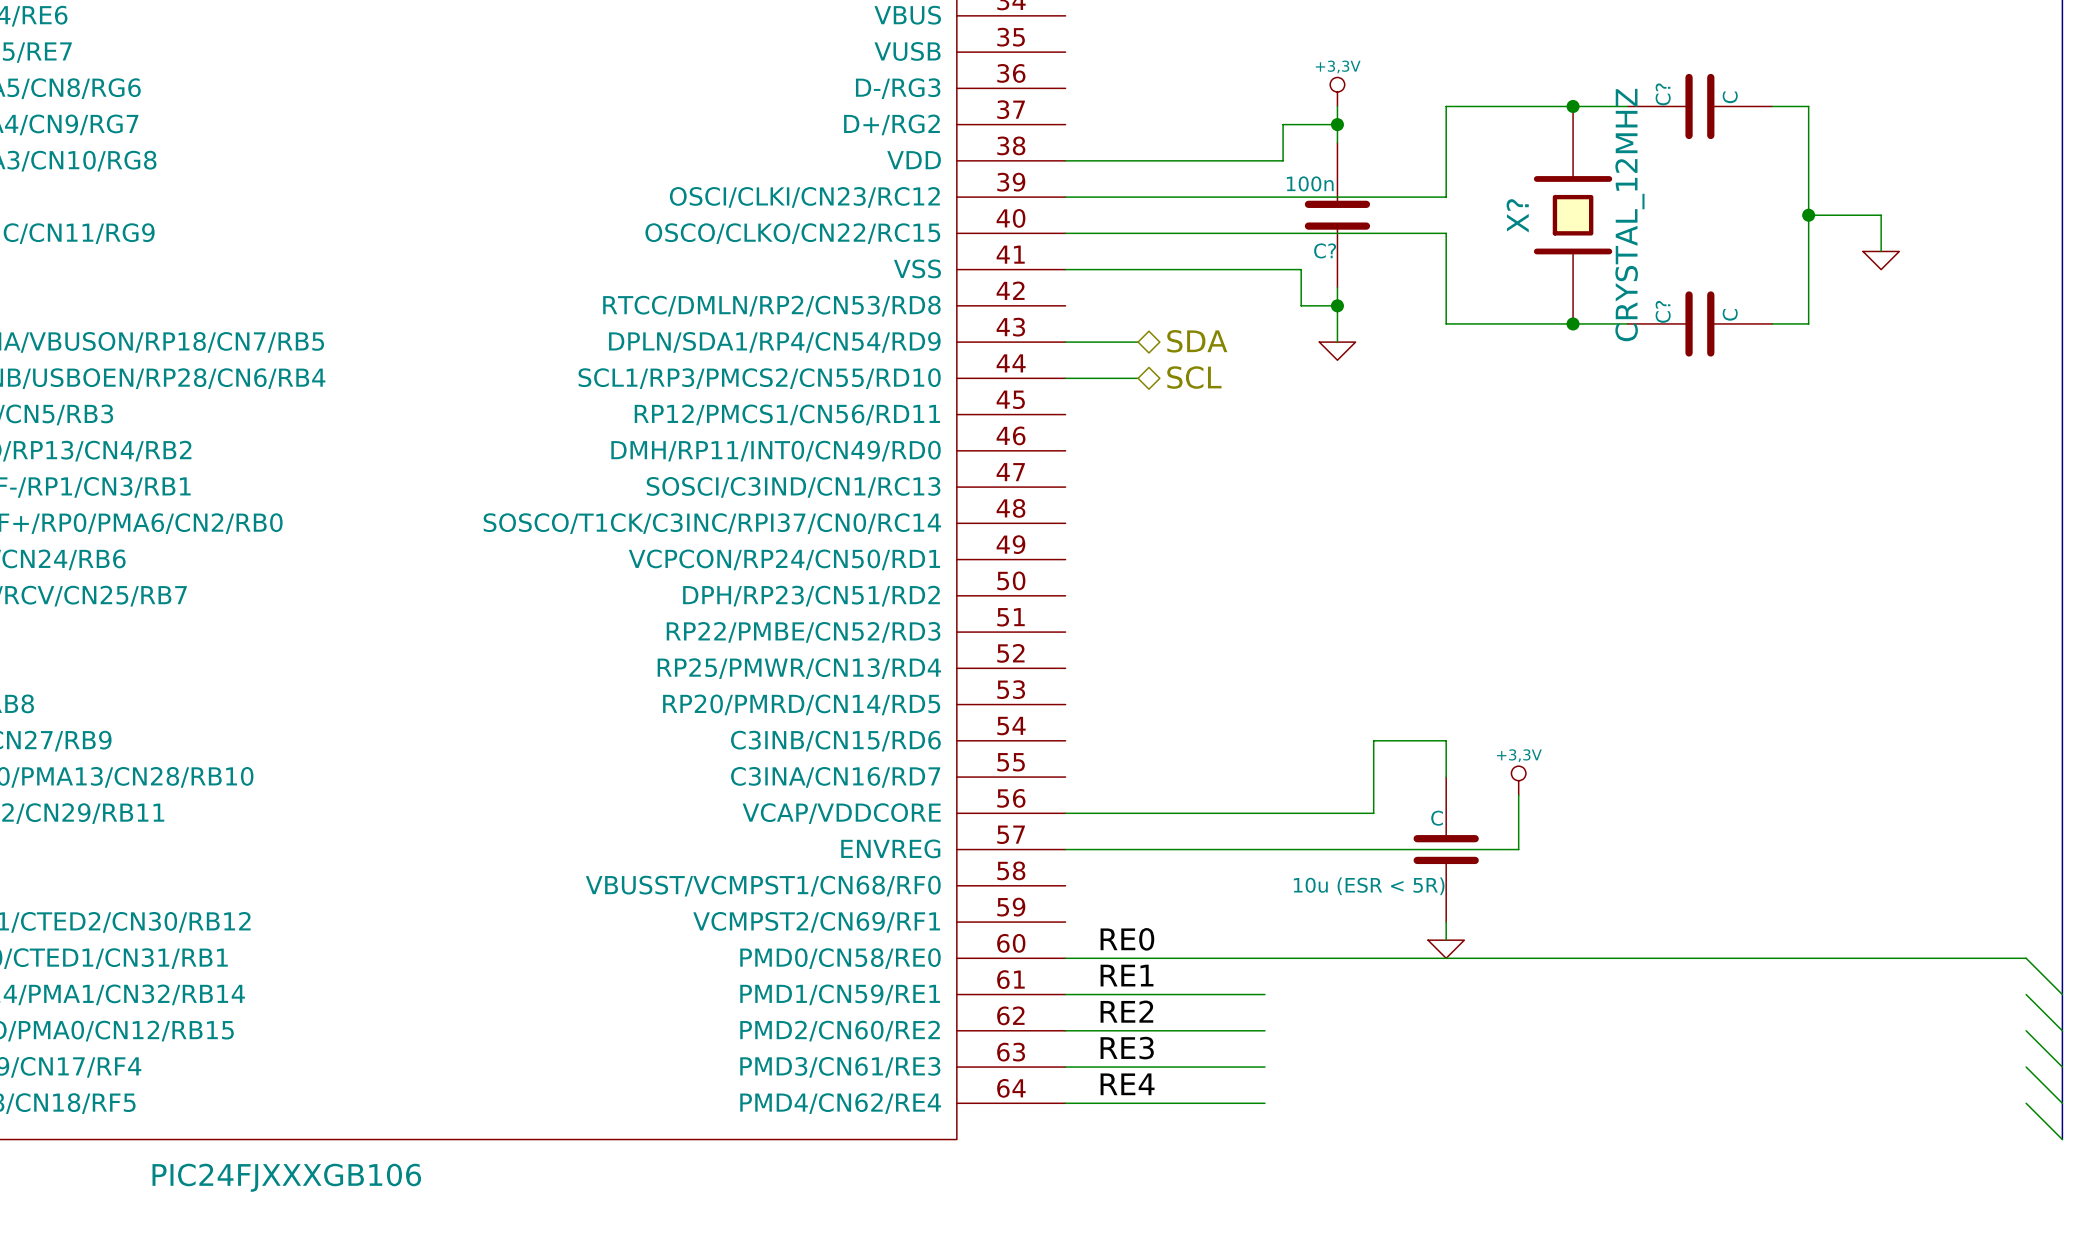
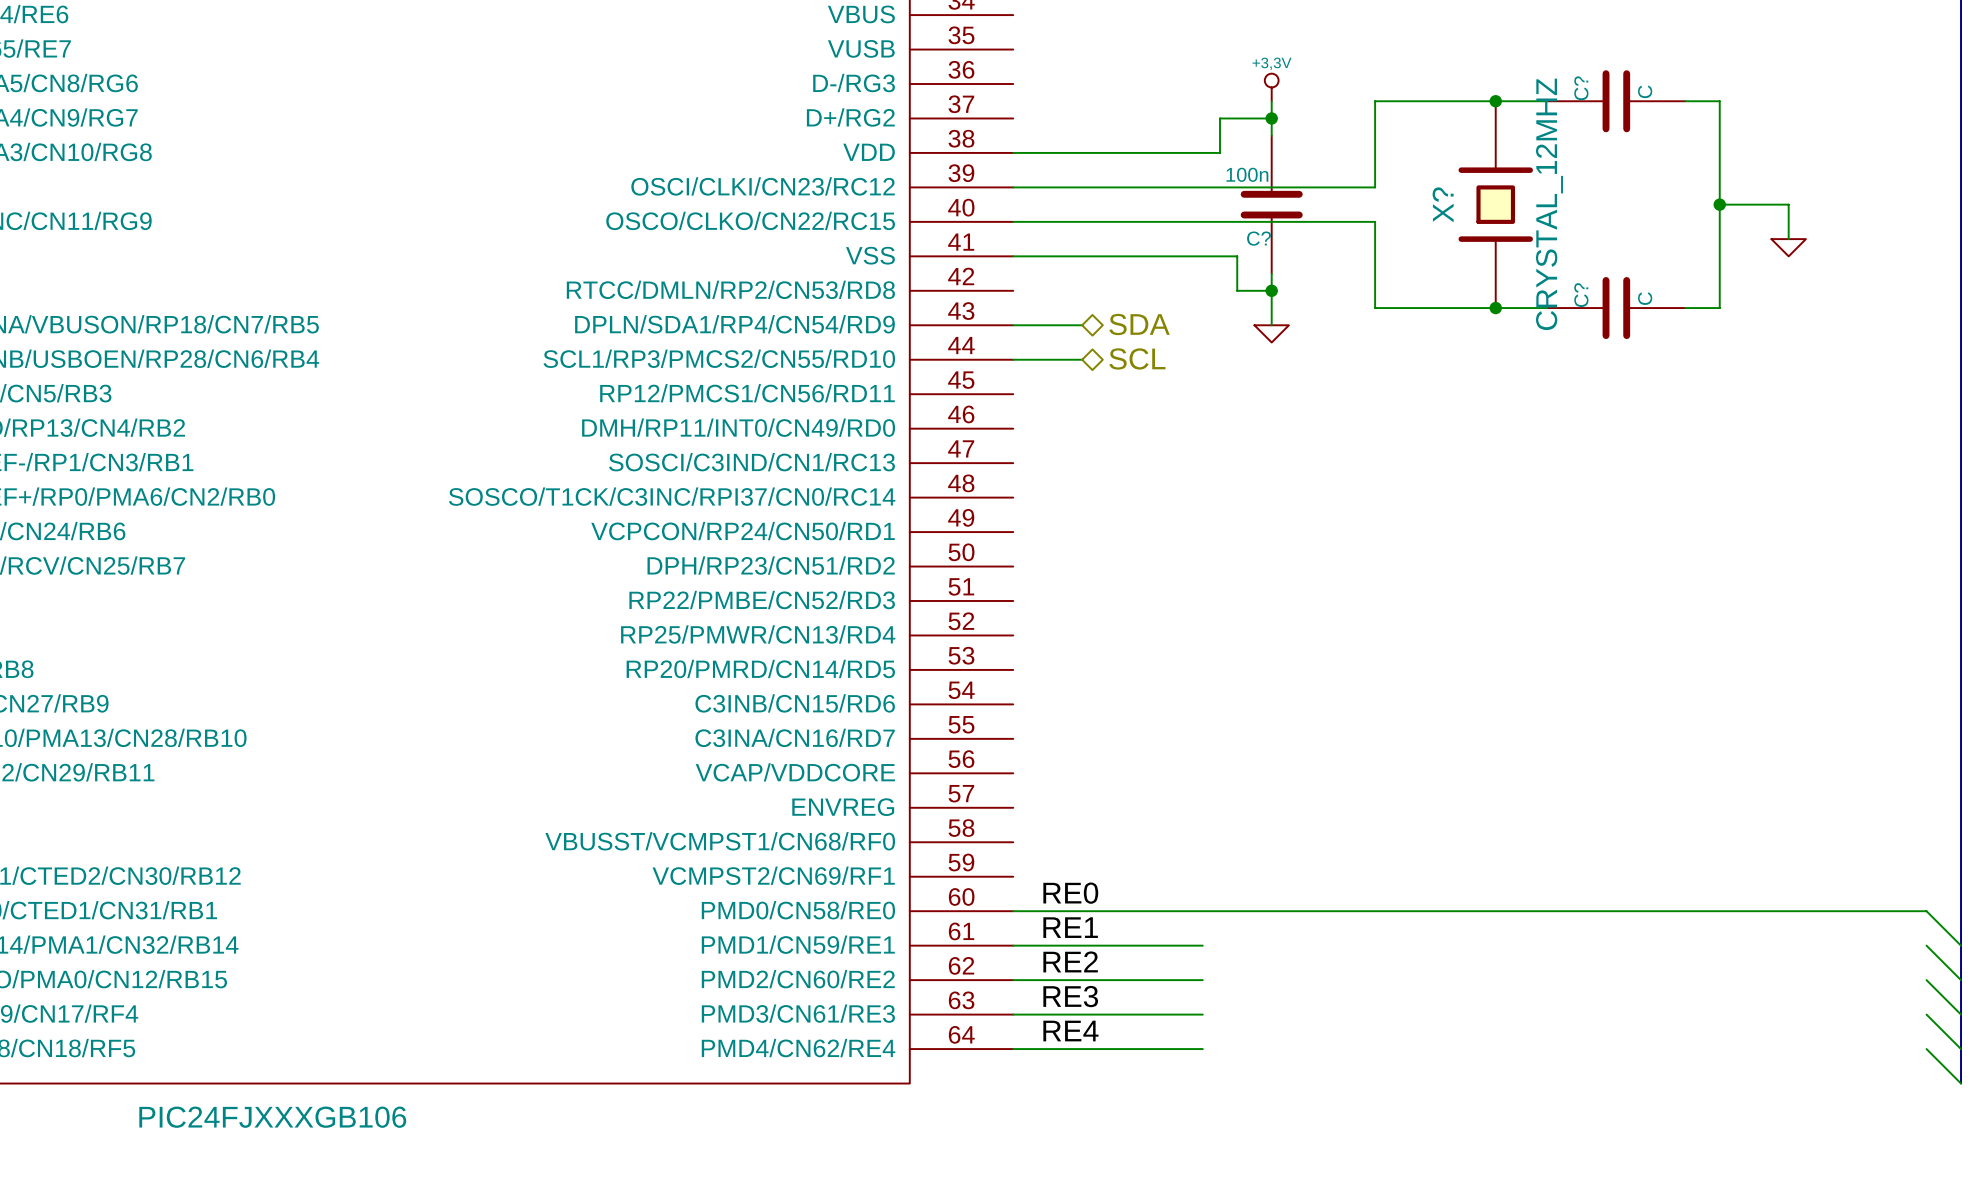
wire: (1446, 777) (1446, 740) (1373, 740) (1373, 813) (1065, 813) -> none
power symbol: +3,3V (1518, 780) -> none
wire: (1518, 795) (1518, 849) (1065, 849) -> none
10u (ESR < 5R): C (1446, 849) -> none
wire: (1446, 922) (1446, 940) -> none
power symbol: (1446, 949) -> none

